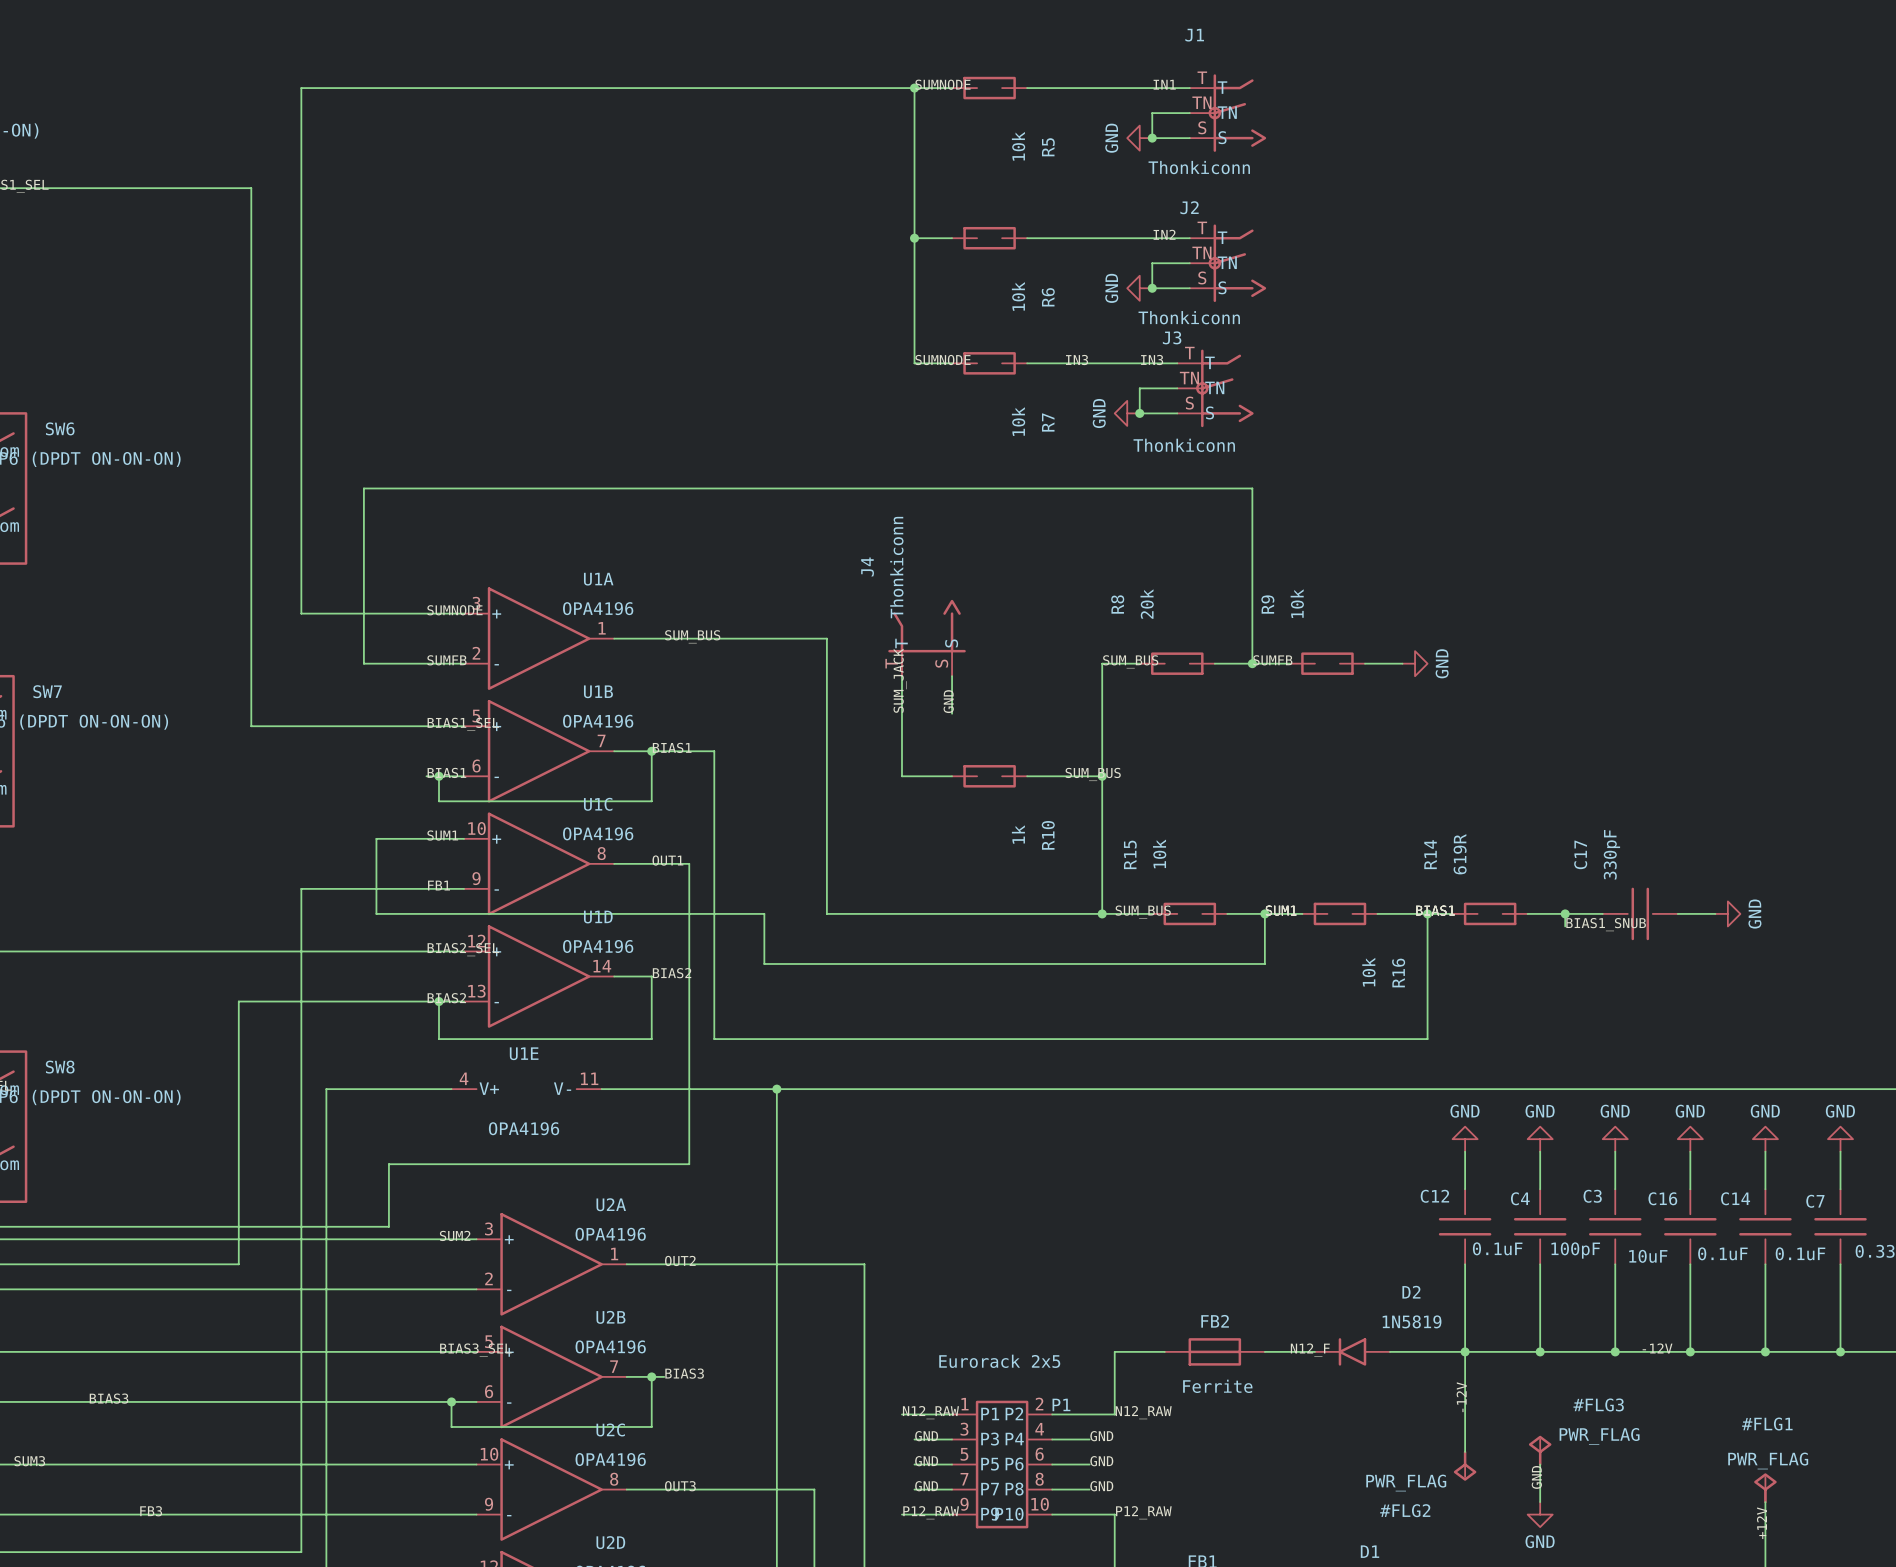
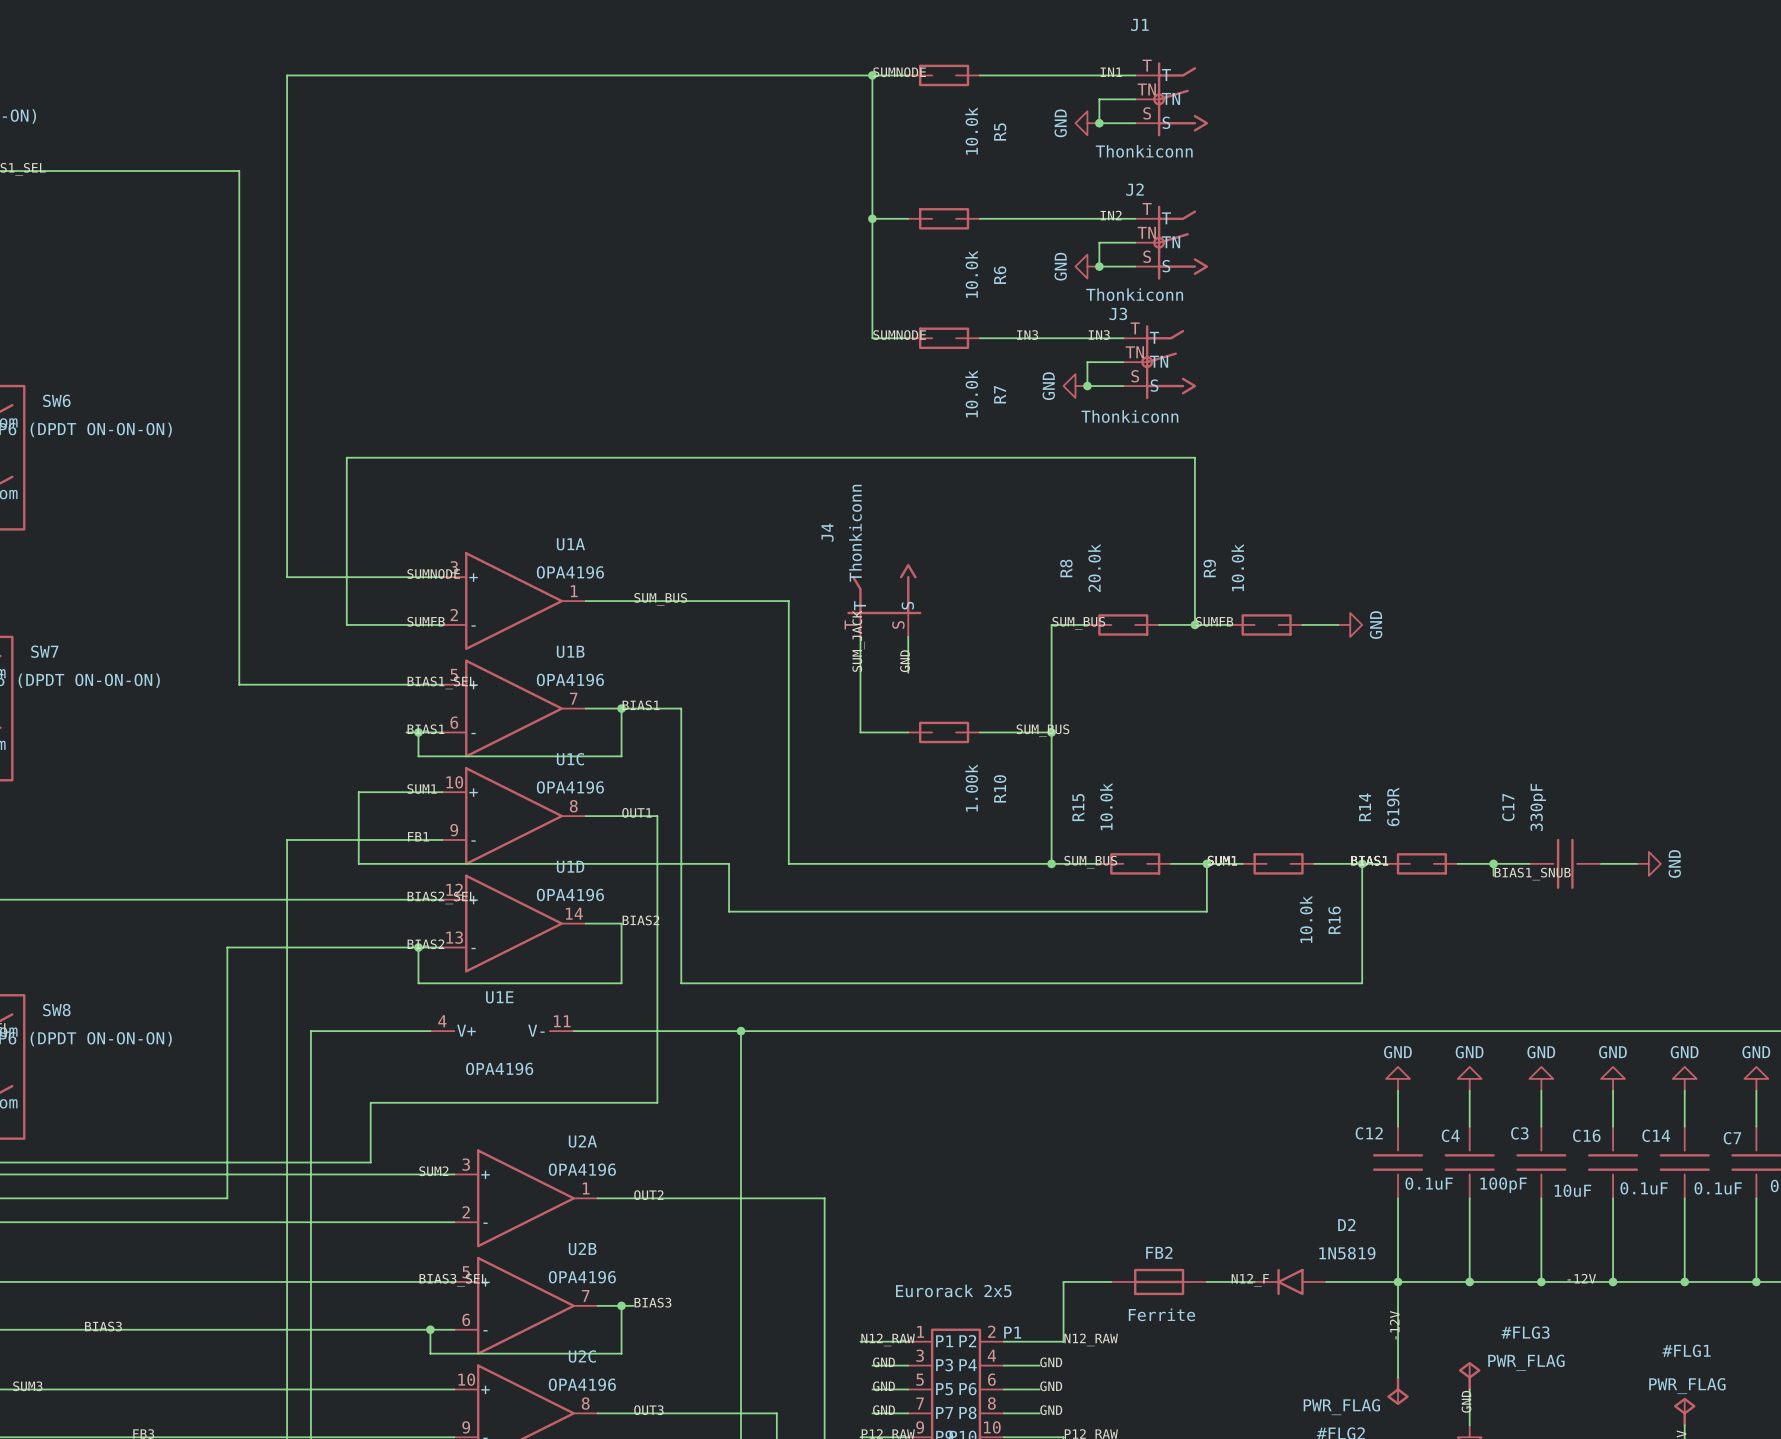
R5 value: 10k (1018, 146) -> 10.0k (971, 131)
R6 value: 10k (1018, 296) -> 10.0k (971, 274)
R7 value: 10k (1018, 421) -> 10.0k (971, 393)
R9 value: 10k (1297, 603) -> 10.0k (1237, 567)
R8 value: 20k (1147, 604) -> 20.0k (1094, 568)
R10 value: 1k (1018, 834) -> 1.00k (971, 788)
R15 value: 10k (1159, 853) -> 10.0k (1106, 806)
R16 value: 10k (1368, 972) -> 10.0k (1306, 919)

